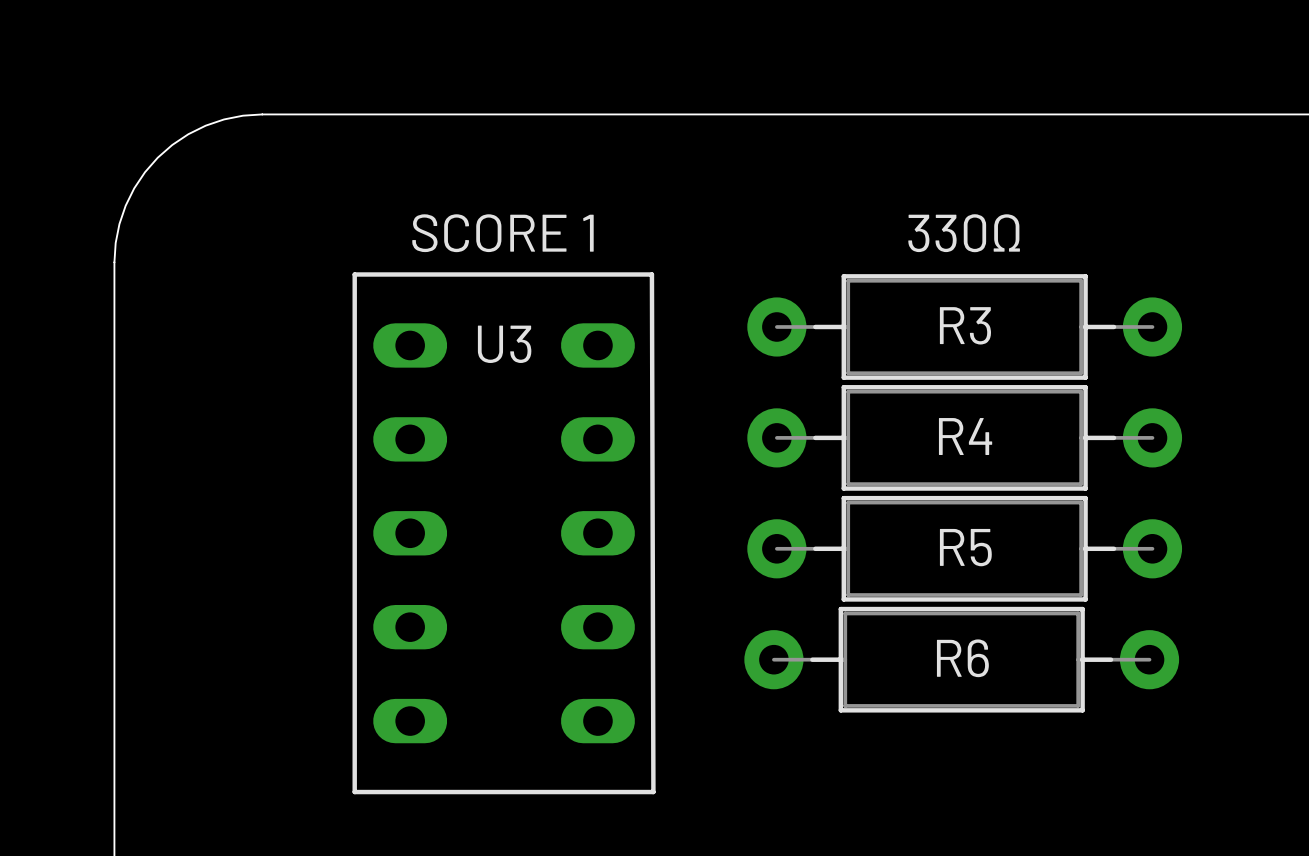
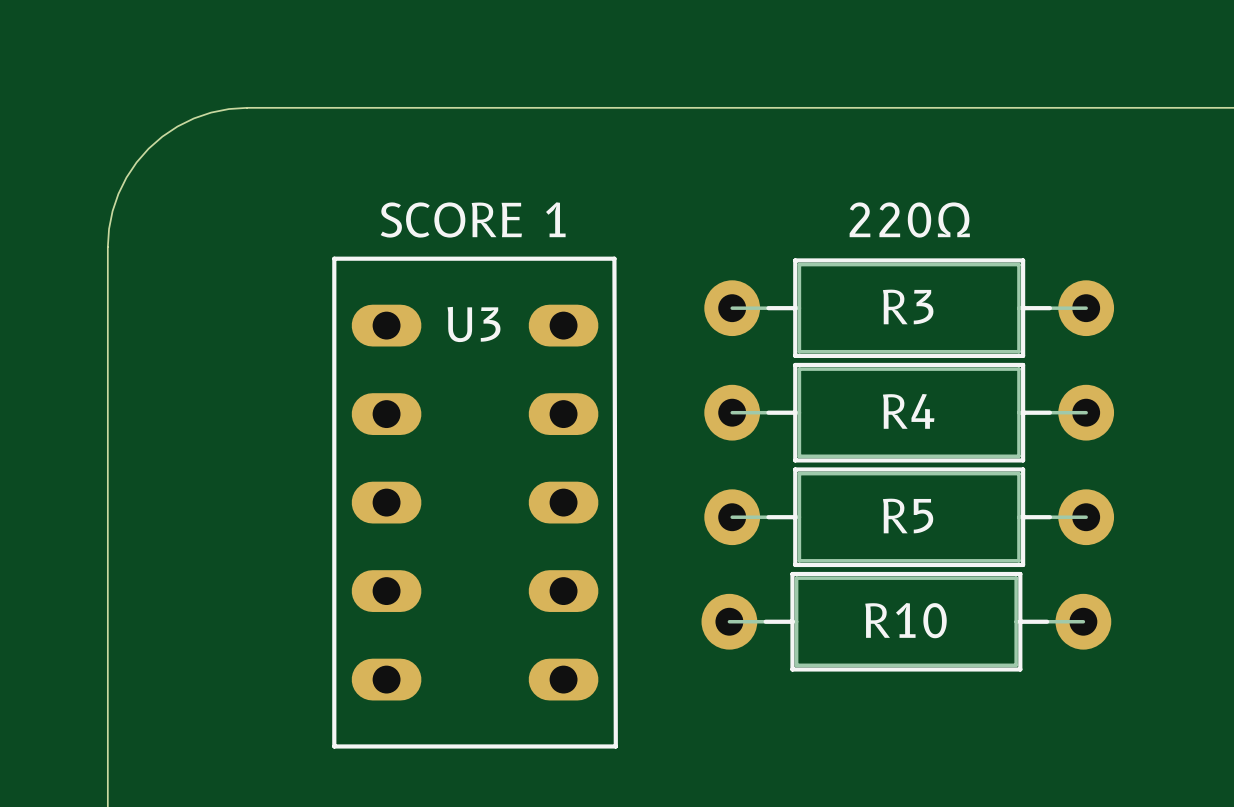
text: 330Ω (964, 233) -> 220Ω (909, 220)
R6 name: R6 (962, 658) -> R10 (905, 620)

